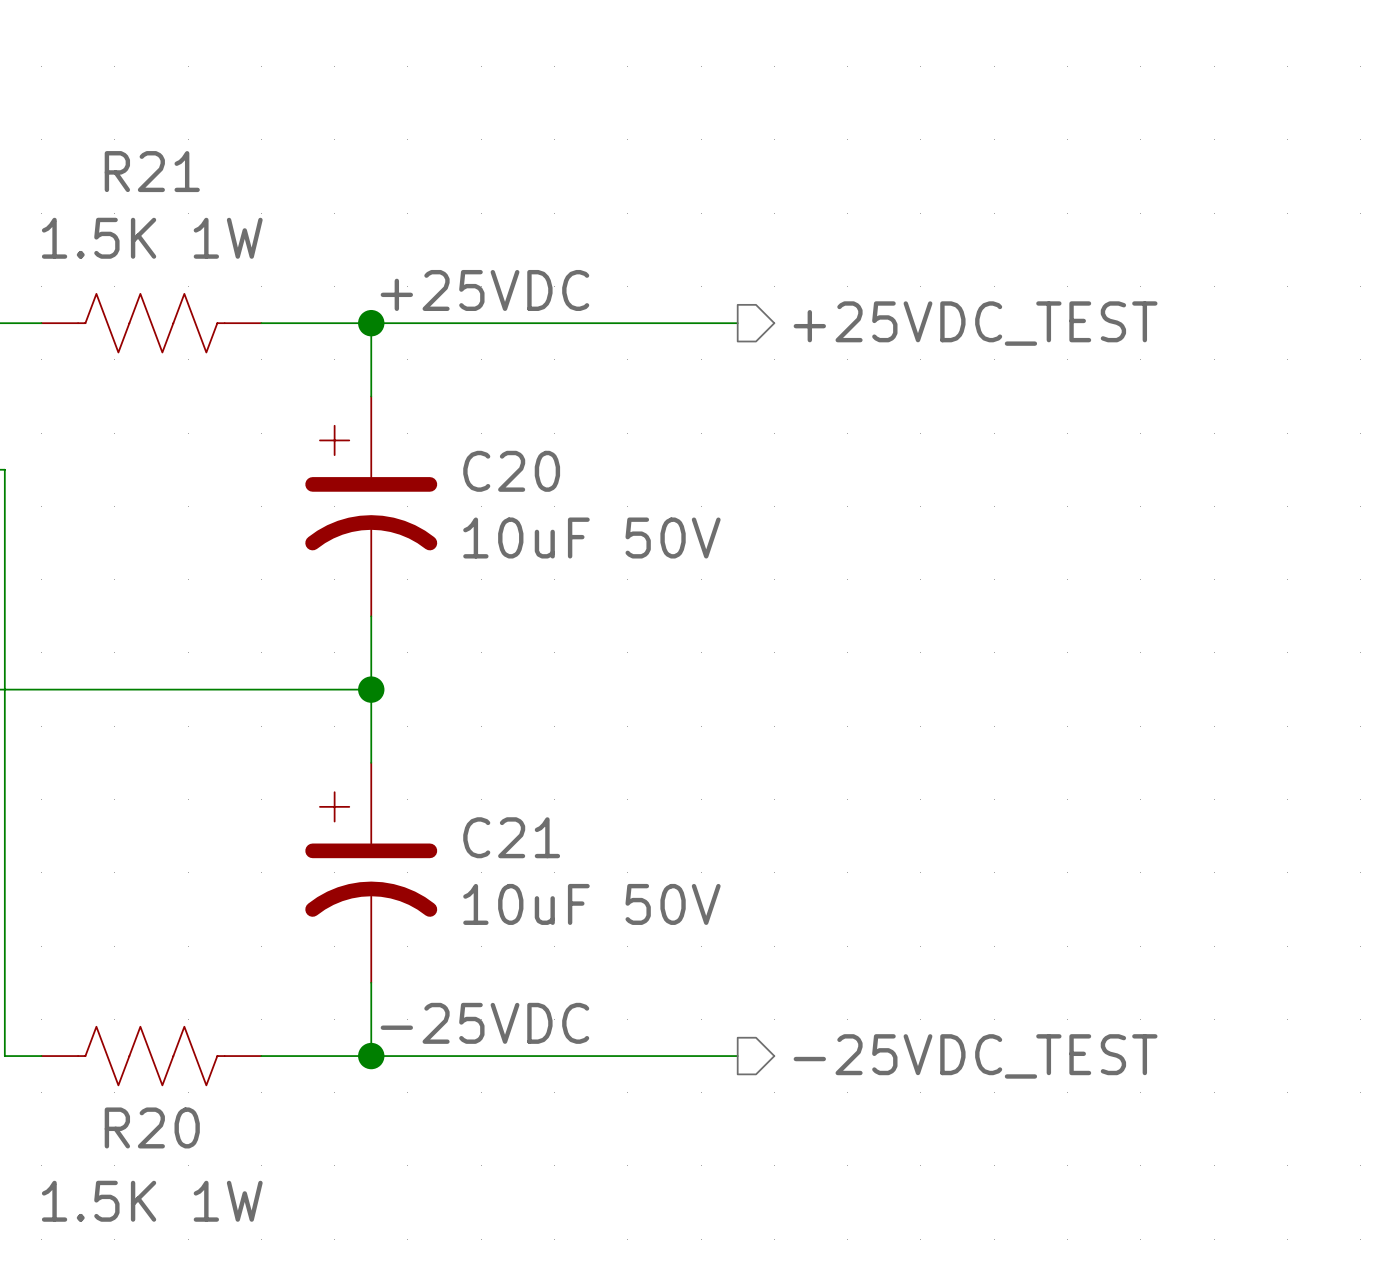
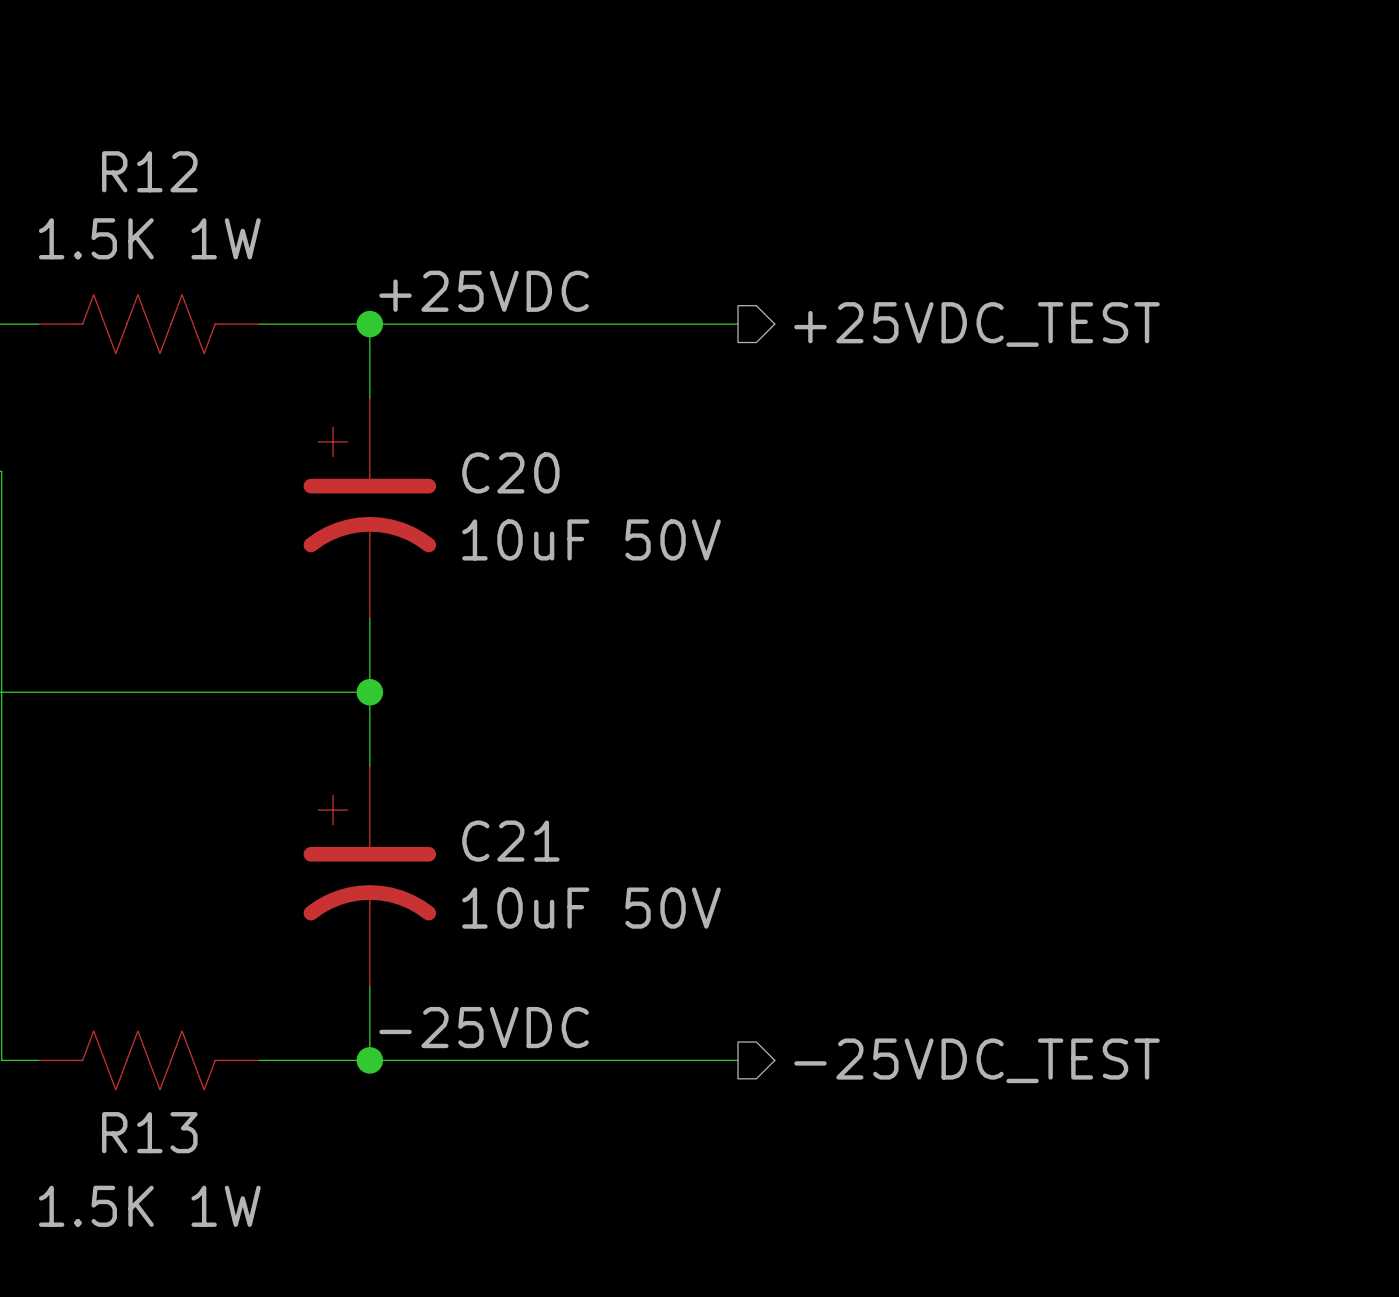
R21 name: R21 (152, 171) -> R12 (149, 171)
R20 name: R20 (152, 1127) -> R13 (149, 1132)

